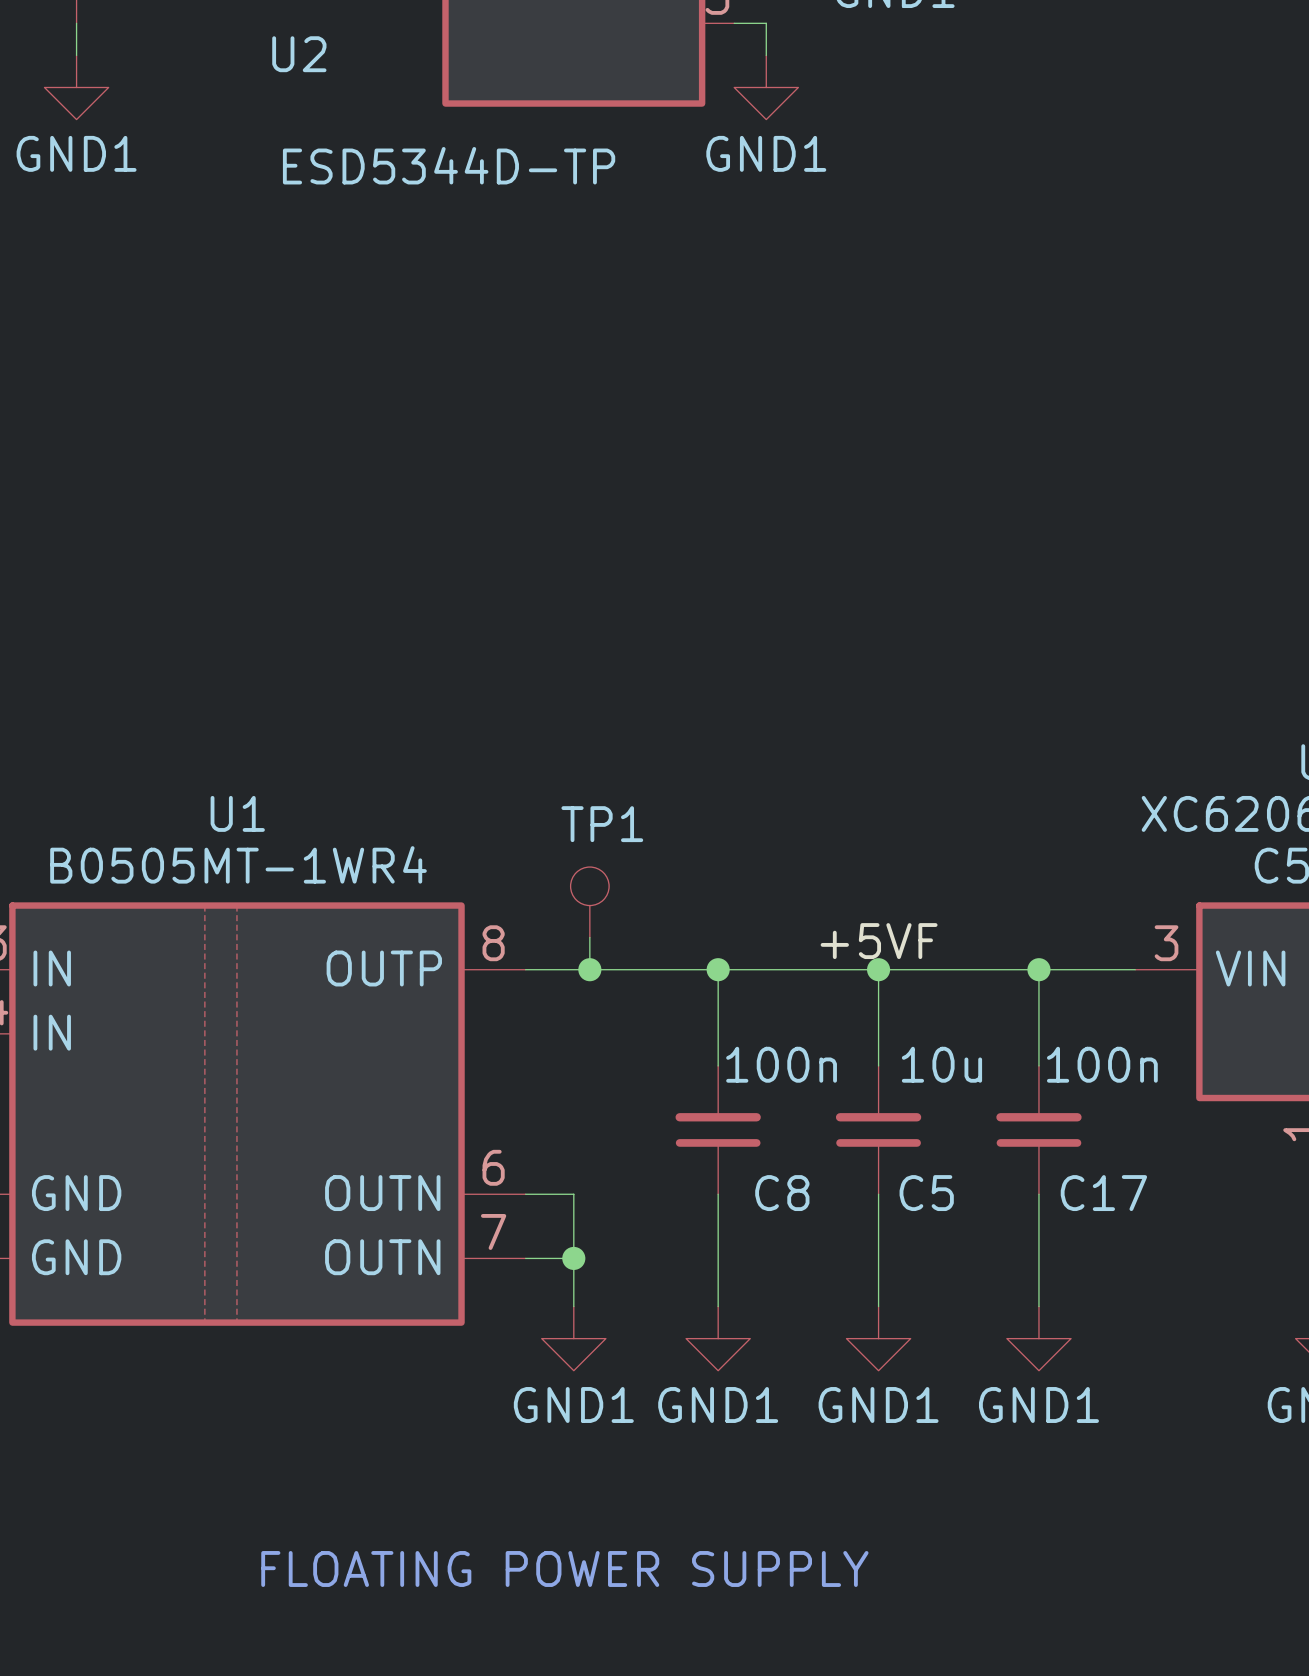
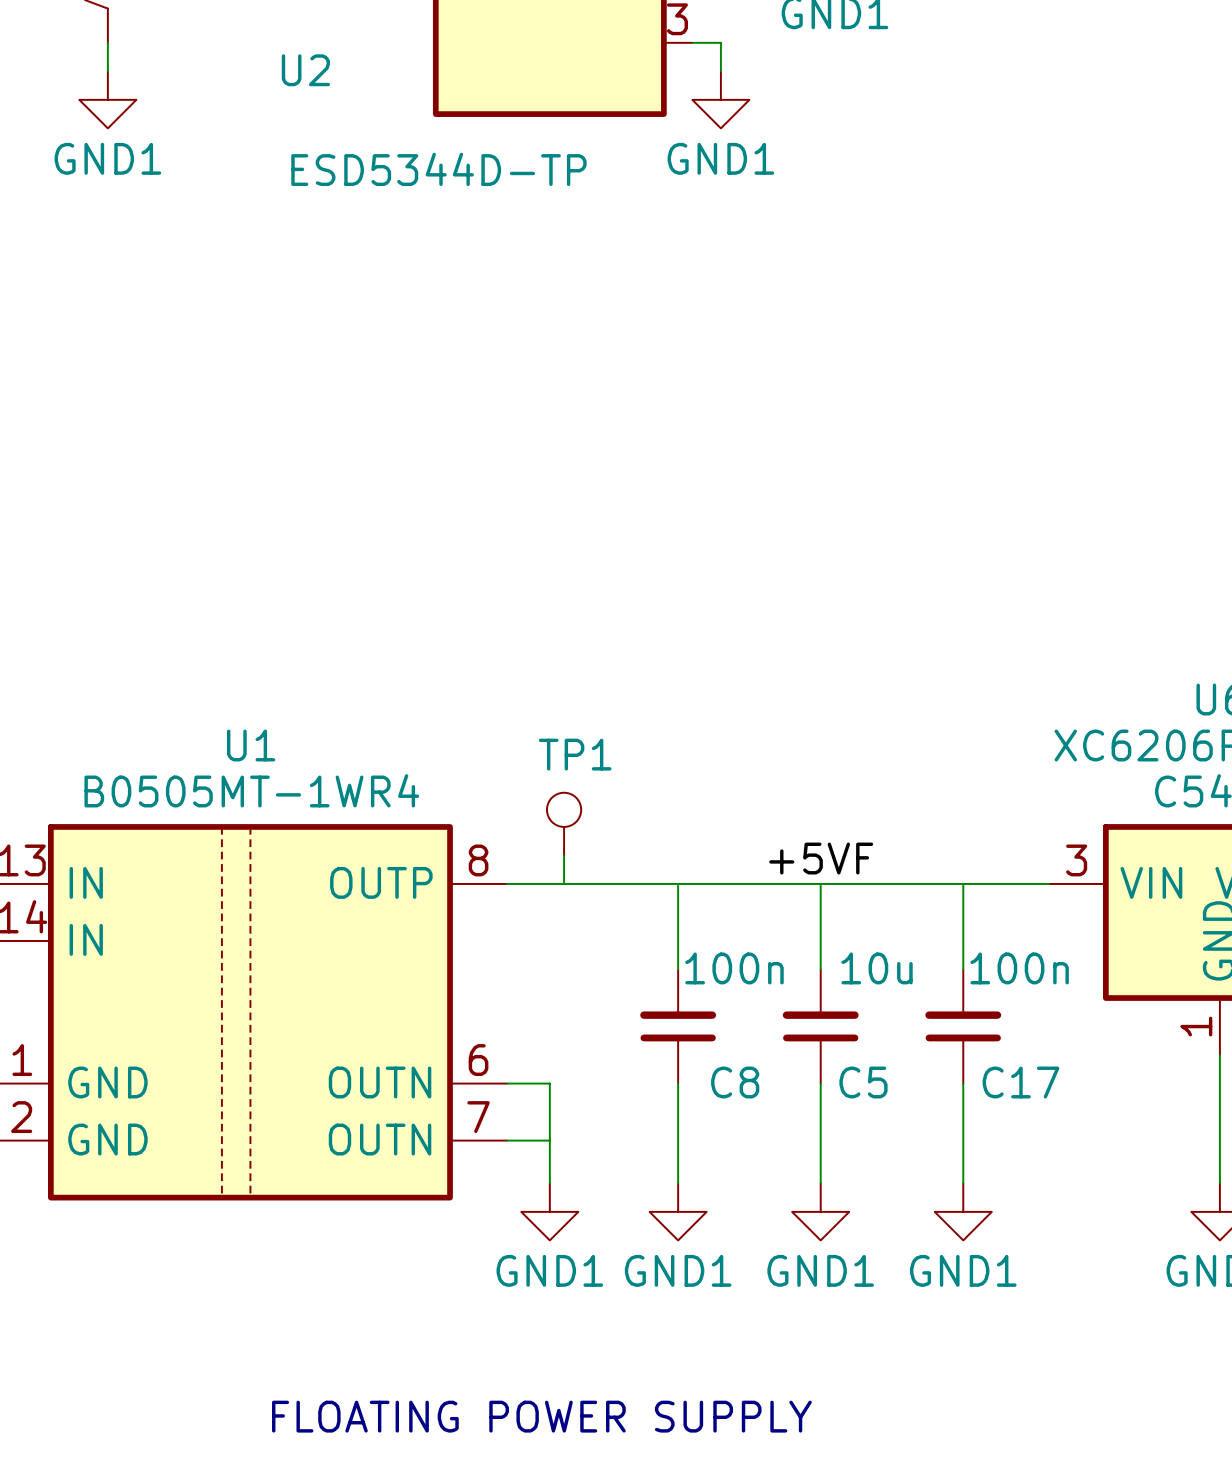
junction: (589, 969) -> none
junction: (718, 969) -> none
junction: (878, 969) -> none
junction: (1038, 969) -> none
junction: (573, 1258) -> none

